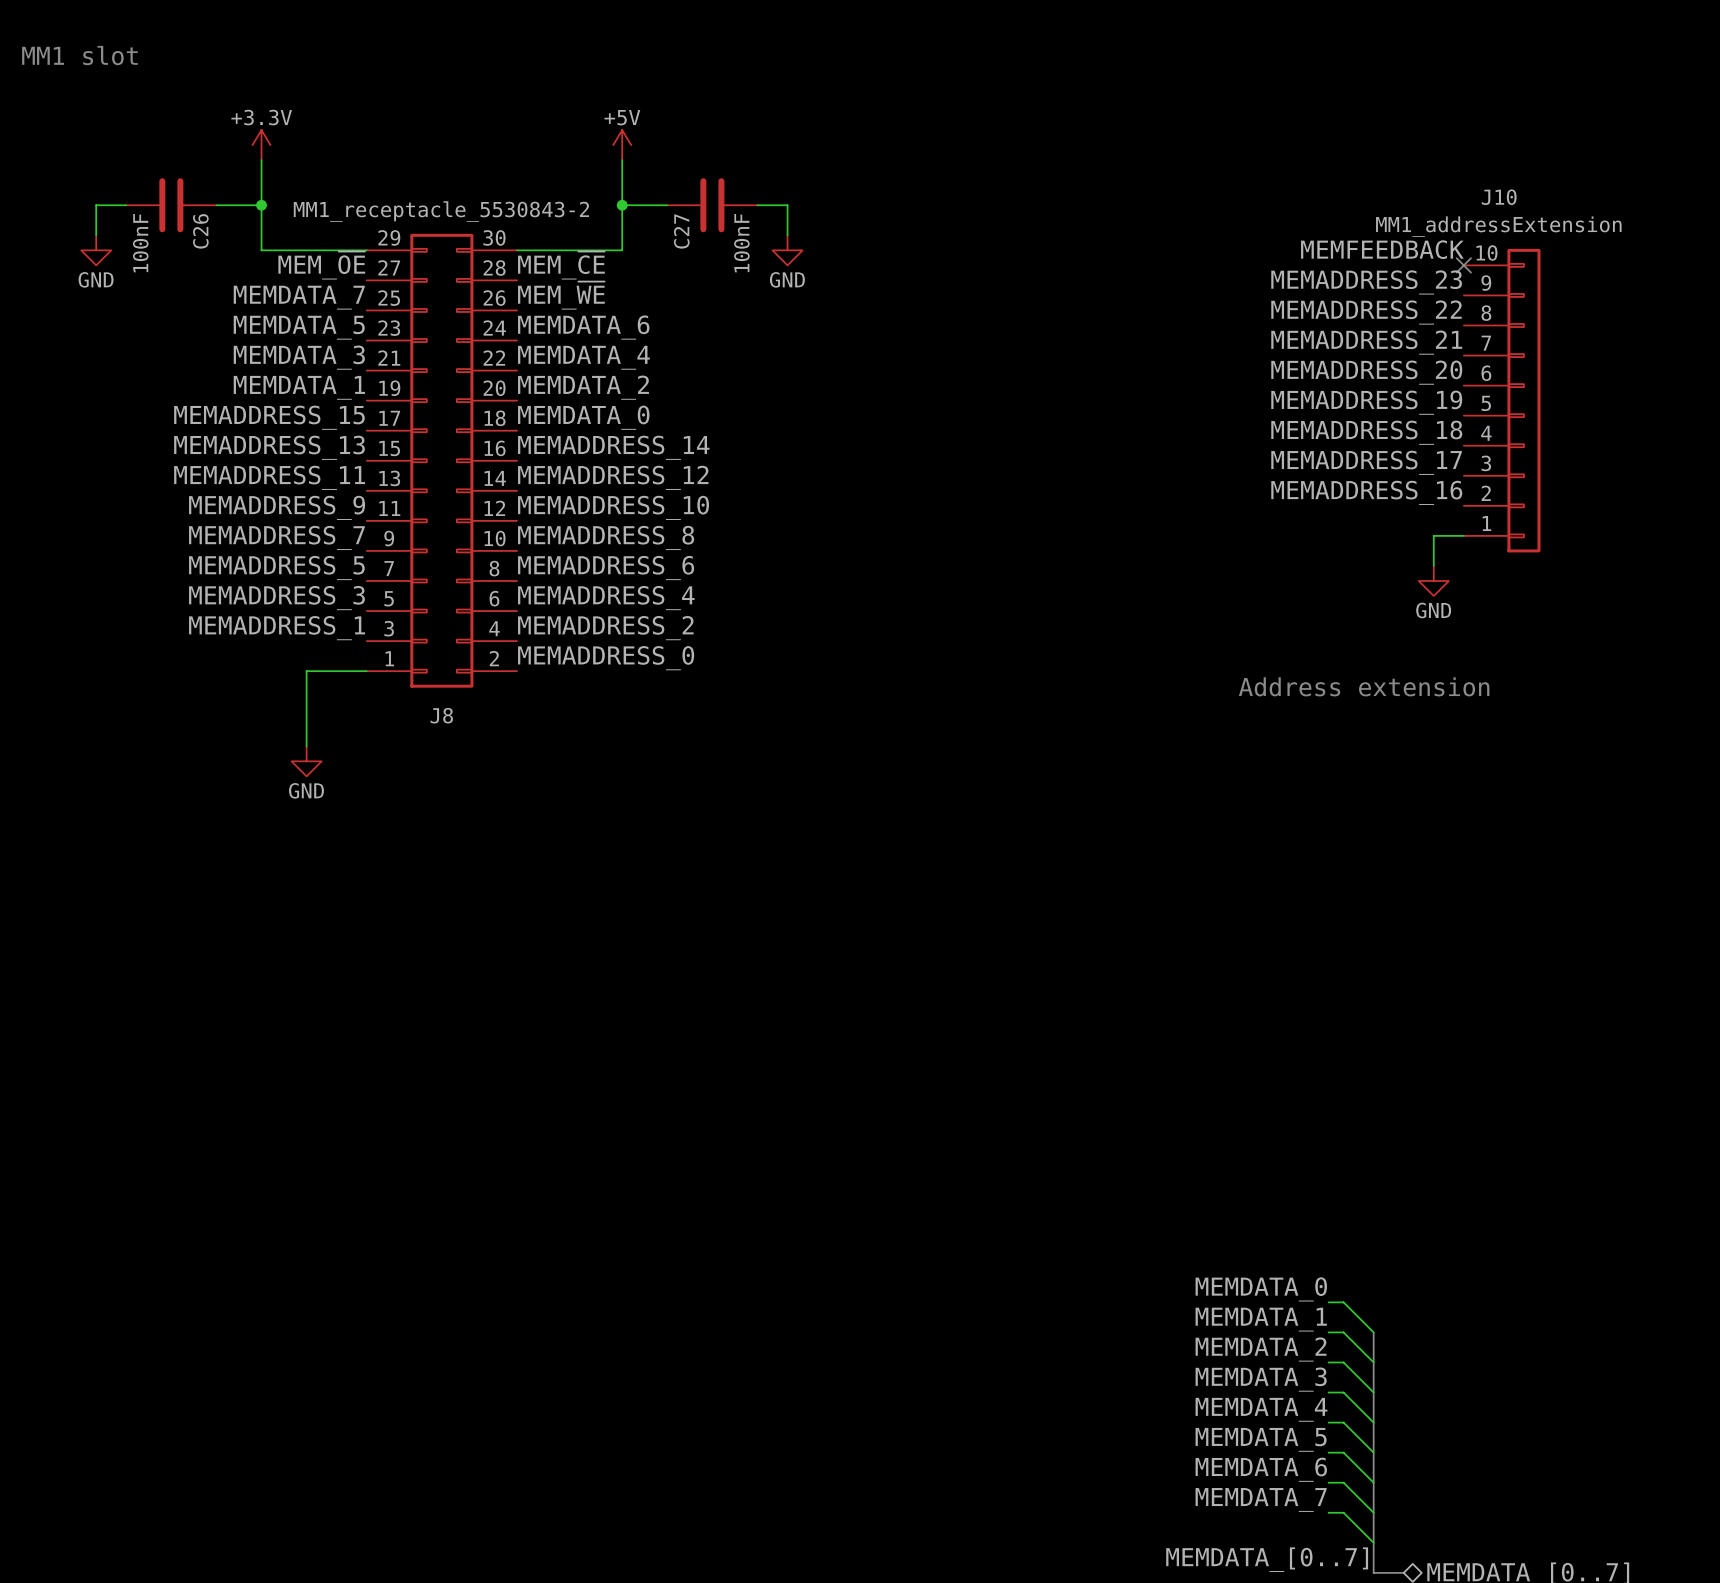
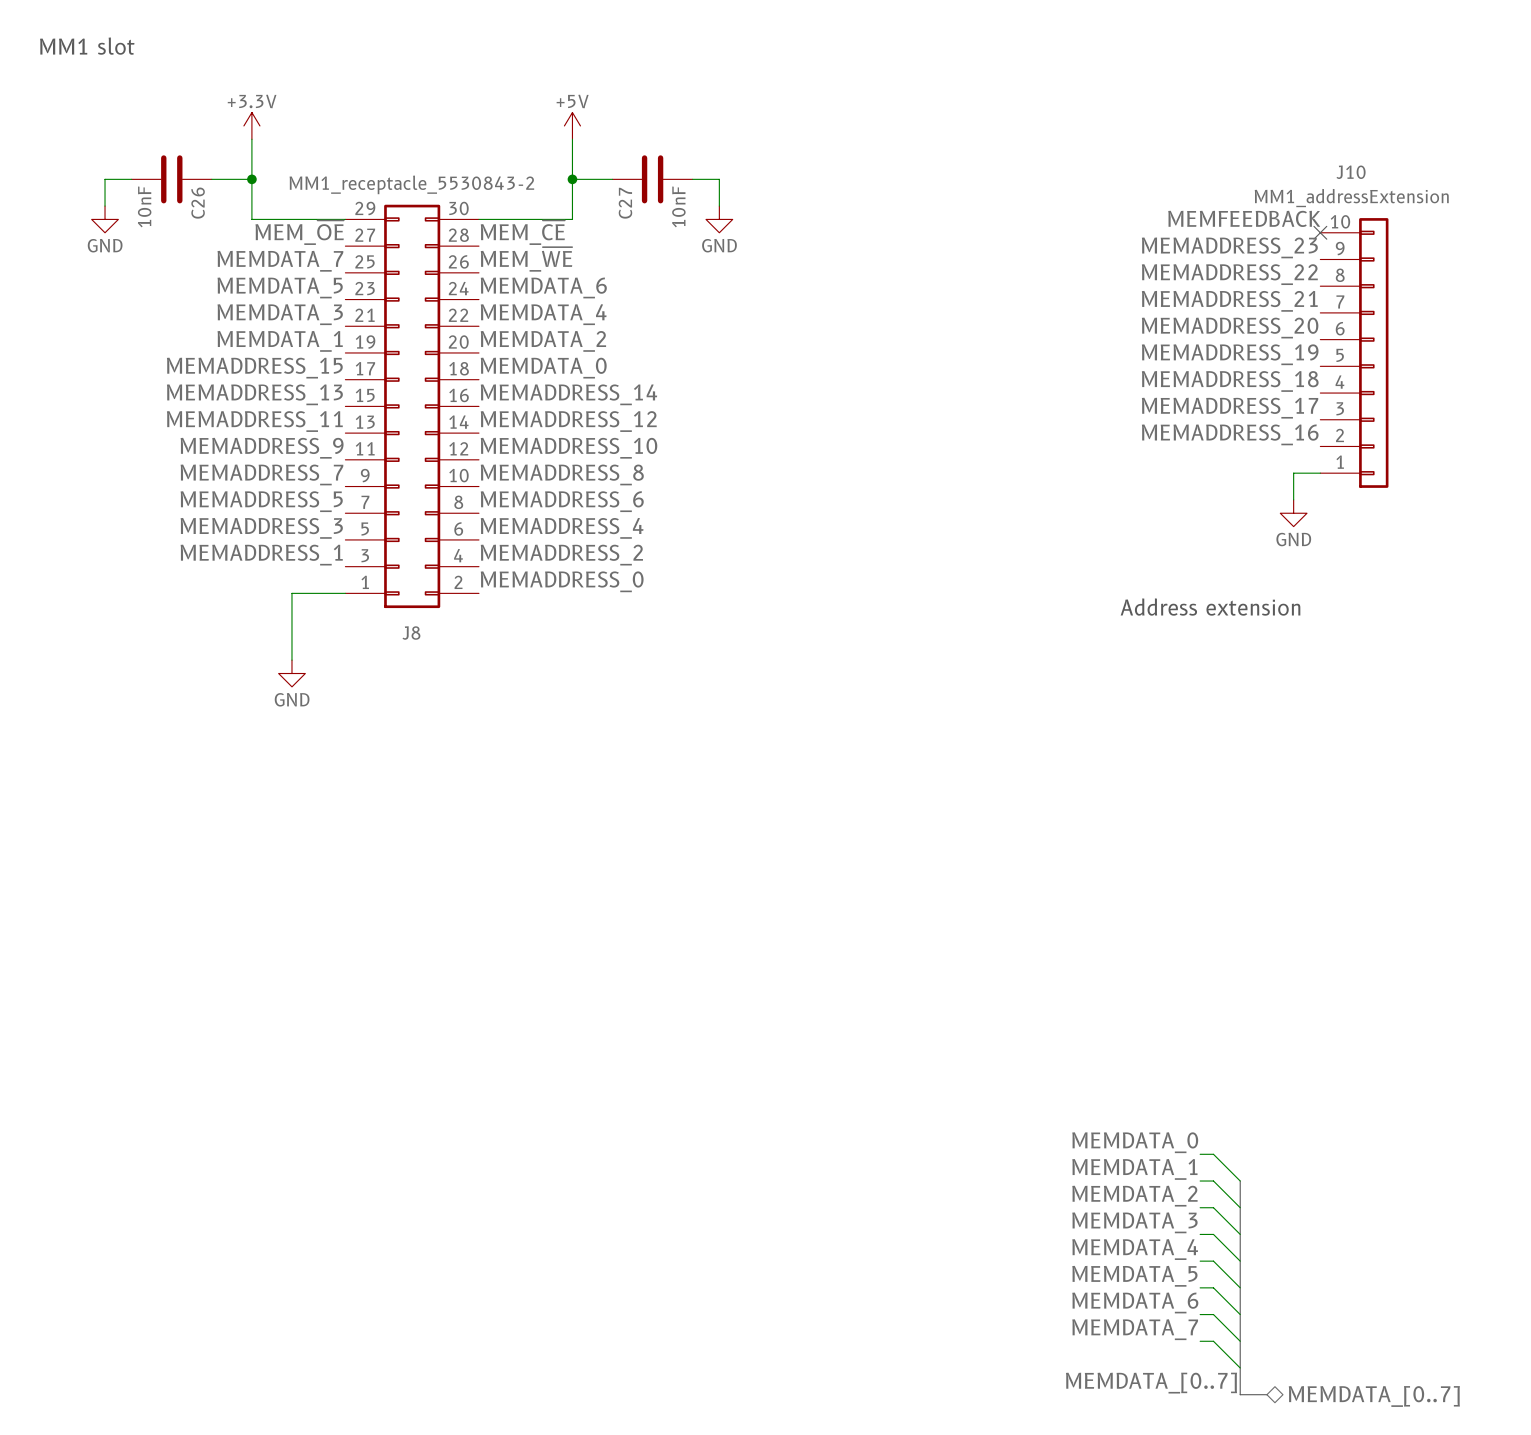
C26 value: 100nF (140, 243) -> 10nF (144, 206)
C27 value: 100nF (741, 243) -> 10nF (678, 206)

